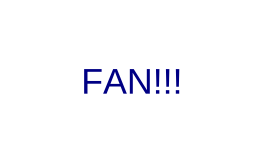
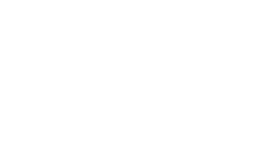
text: FAN!!! (131, 81) -> none

